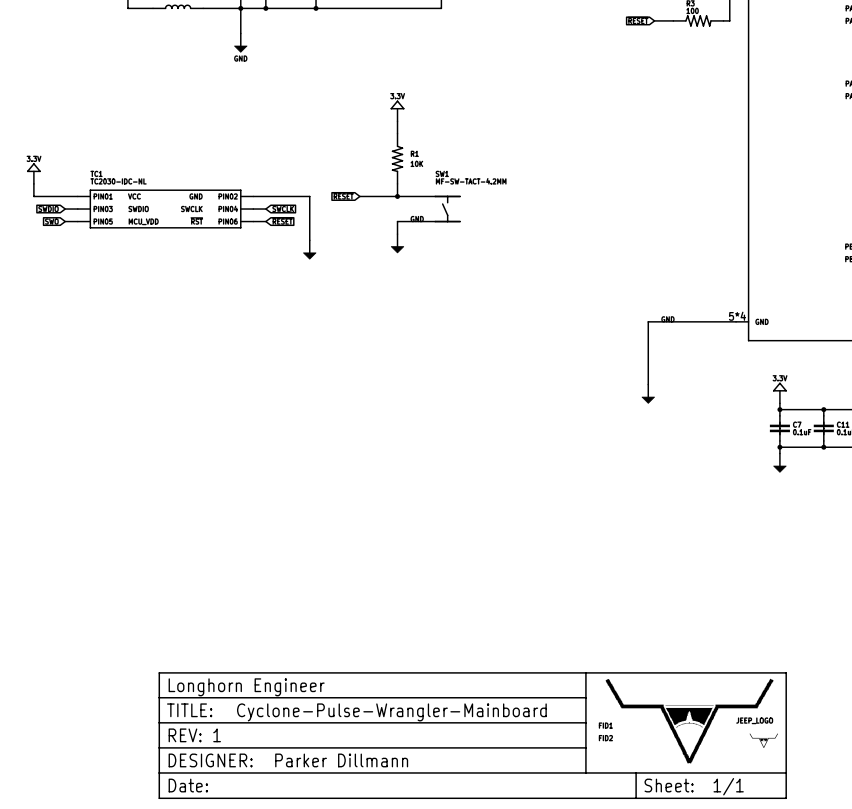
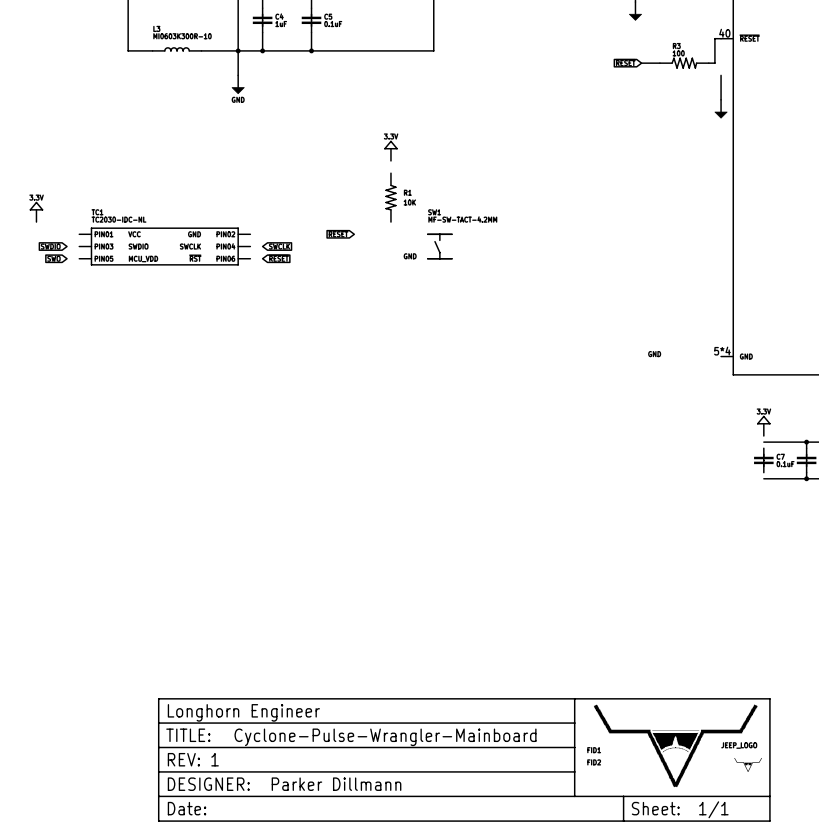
wire: none -> (721, 75) (721, 99)
power symbol: none -> (721, 109)
wire: (397, 121) (397, 133) -> none
wire: (33, 183) (33, 196) (77, 196) -> none
wire: (397, 183) (397, 196) -> none
wire: (253, 196) (309, 196) (309, 240) -> none
wire: (359, 196) (435, 196) -> none
junction: (397, 196) -> none
wire: (65, 209) (77, 209) -> none
wire: (253, 209) (265, 209) -> none
wire: (65, 221) (77, 221) -> none
wire: (253, 221) (265, 221) -> none
wire: (435, 221) (397, 221) (397, 234) -> none
power symbol: (397, 243) -> none
power symbol: (309, 249) -> none
wire: (736, 321) (648, 321) (648, 384) -> none
power symbol: (648, 394) -> none
wire: (779, 403) (779, 415) -> none
junction: (779, 409) -> none
wire: (779, 440) (779, 453) -> none
junction: (779, 447) -> none
power symbol: (779, 463) -> none

